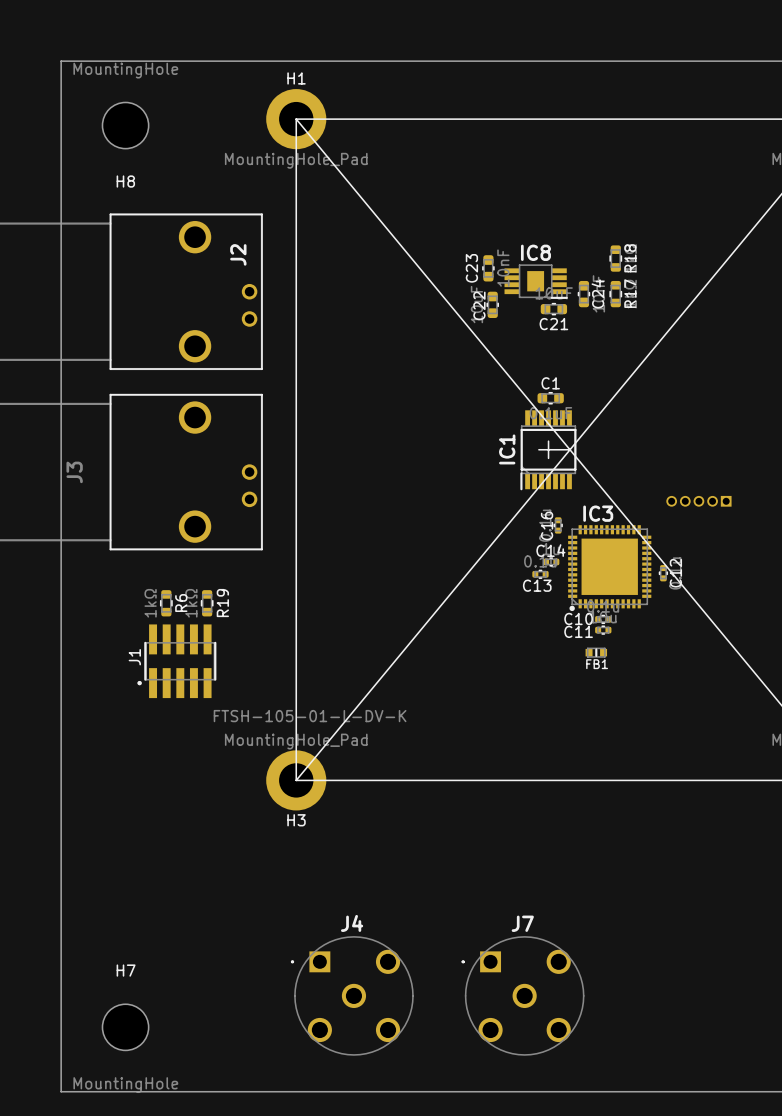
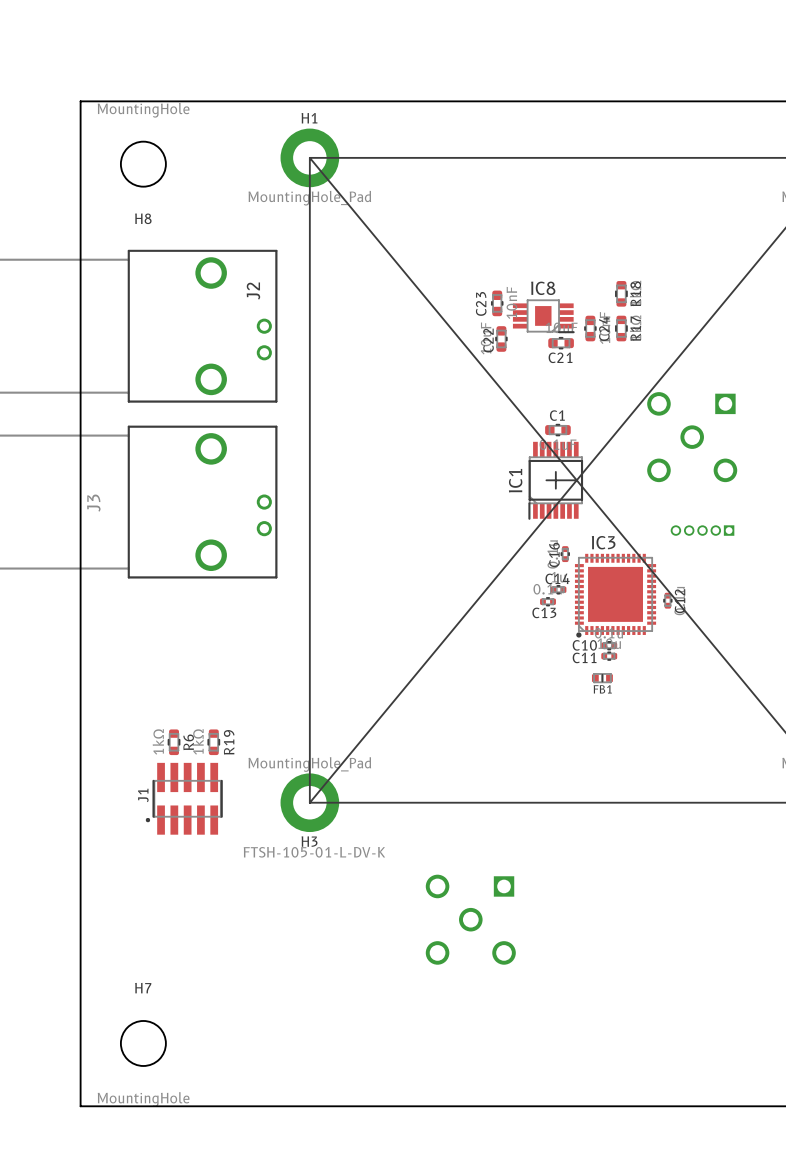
part: none -> (692, 437)
R6 position: (166, 603) -> (174, 742)
R19 position: (207, 603) -> (213, 742)
J1 position: (176, 661) -> (184, 798)
J4 side: top (352, 995) -> bottom (470, 919)
J7: (522, 995) -> none

